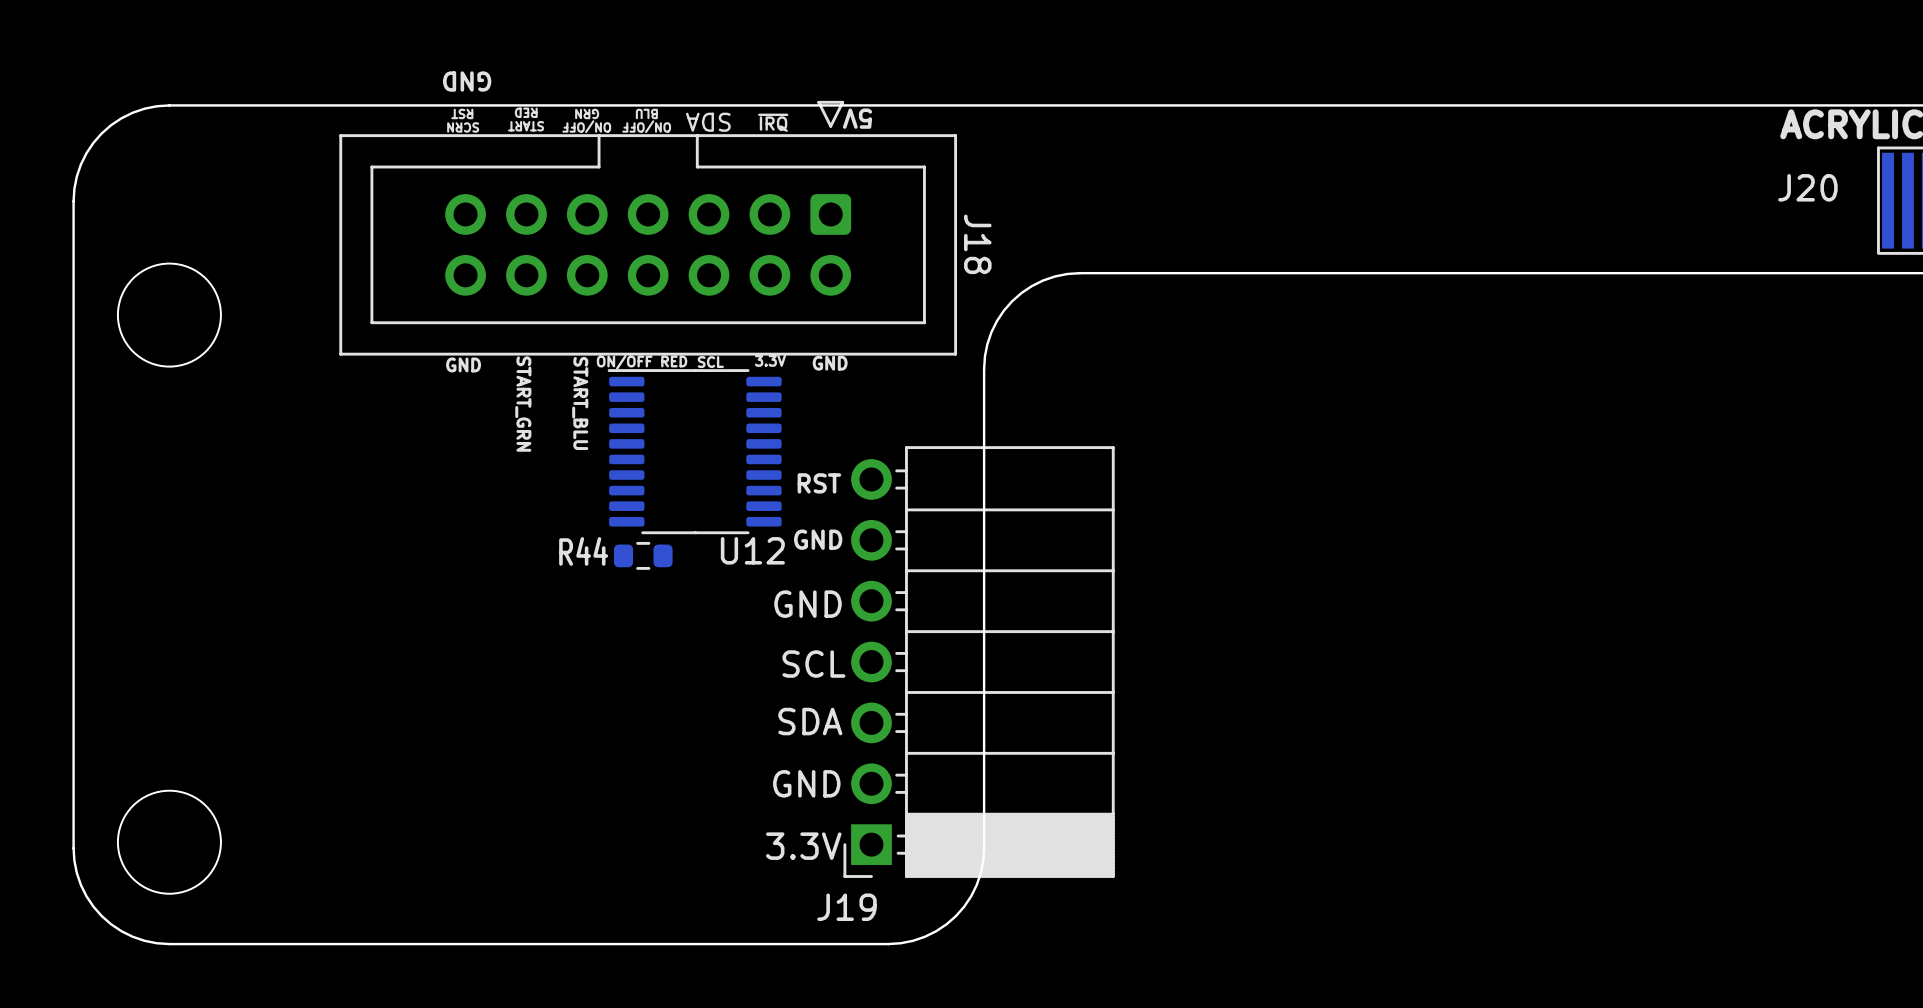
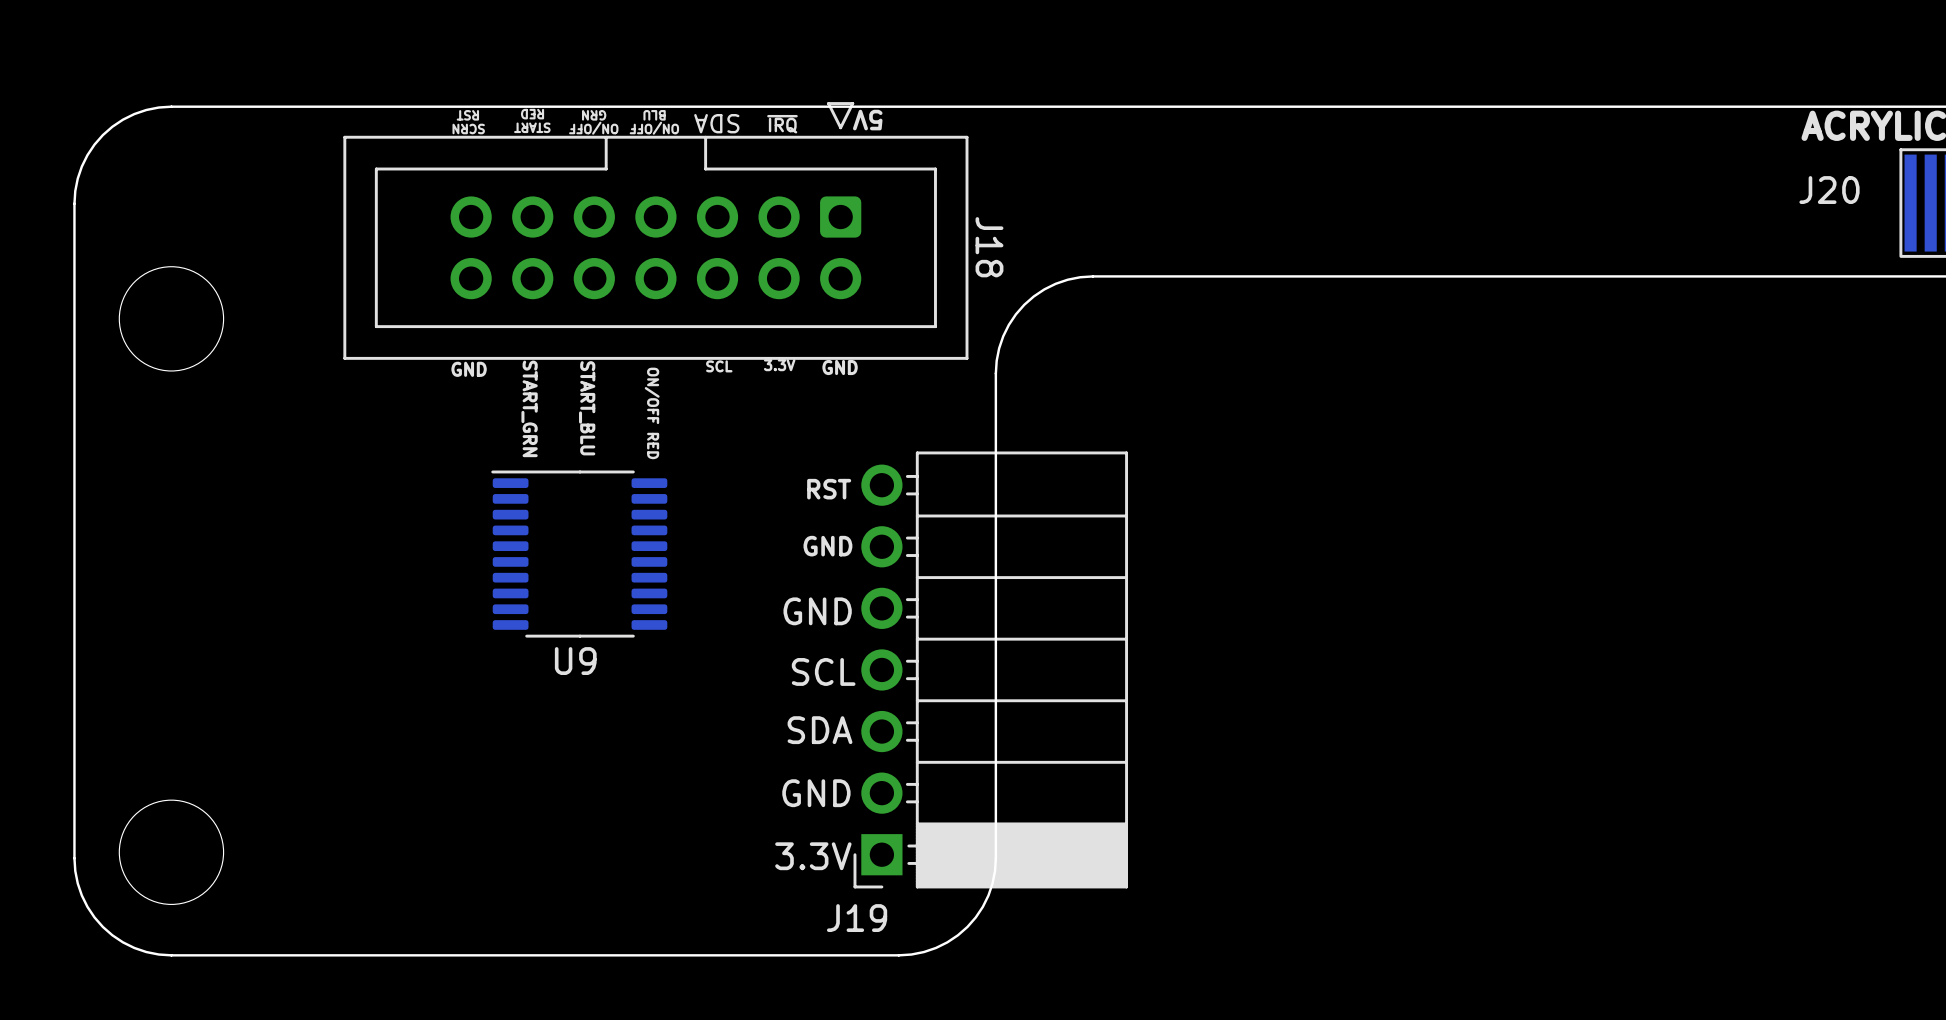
text: GND (467, 81) -> none
text rotation: 0° (642, 362) -> 90° clockwise (652, 413)
U12: (694, 451) -> none
U9: none -> (579, 554)
R44: (643, 555) -> none

